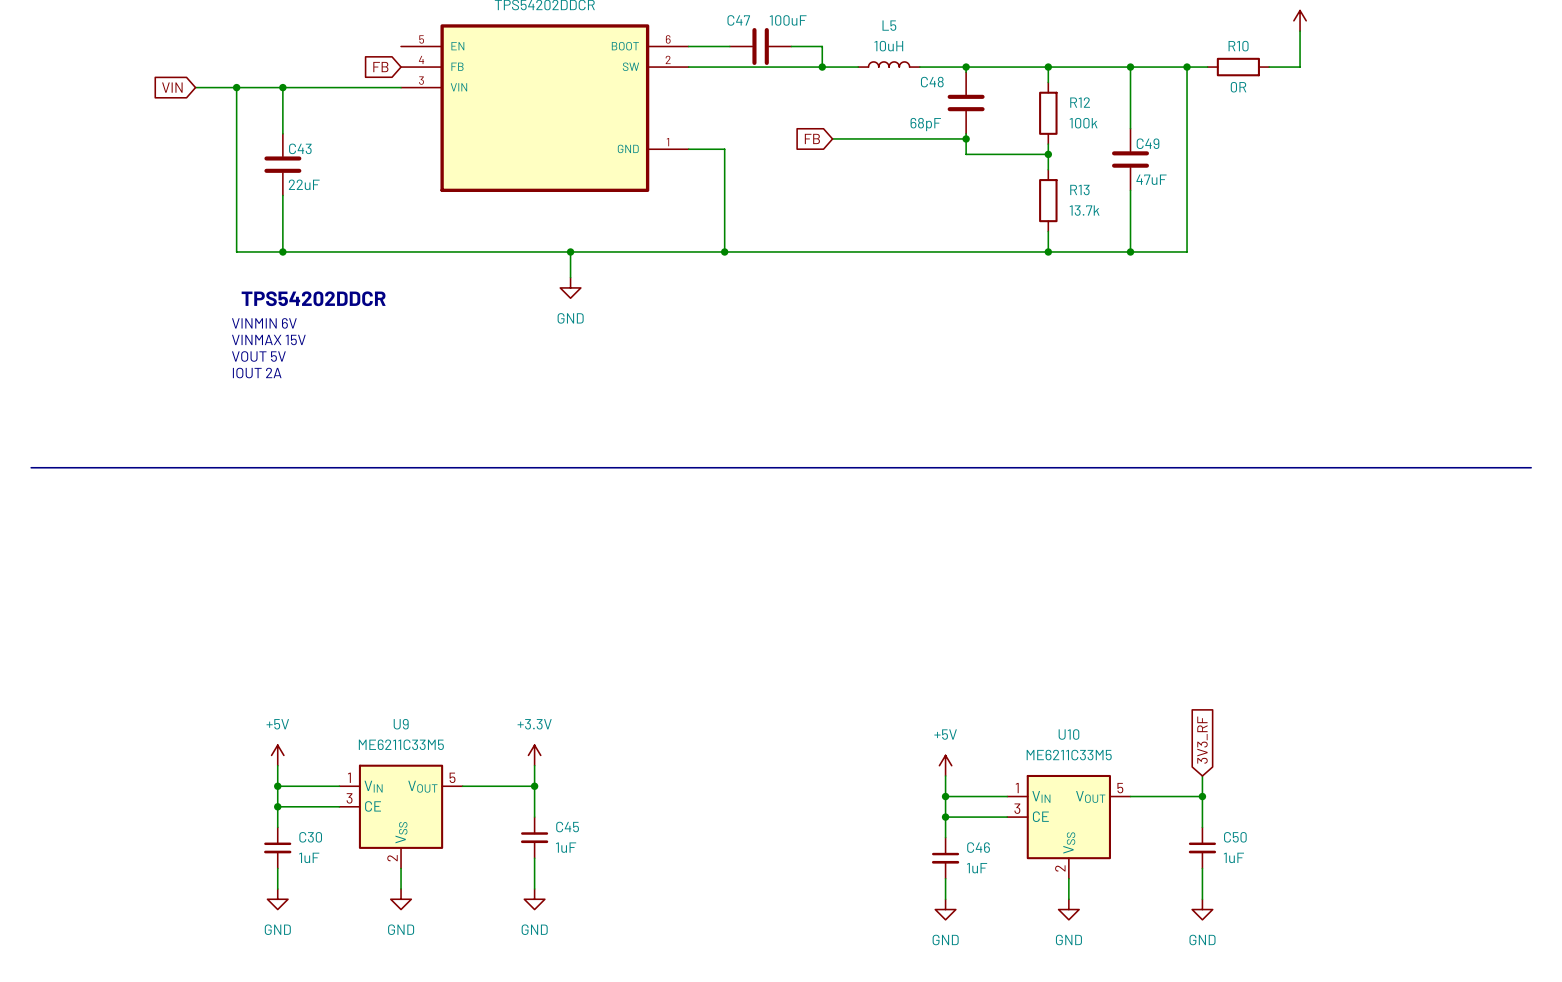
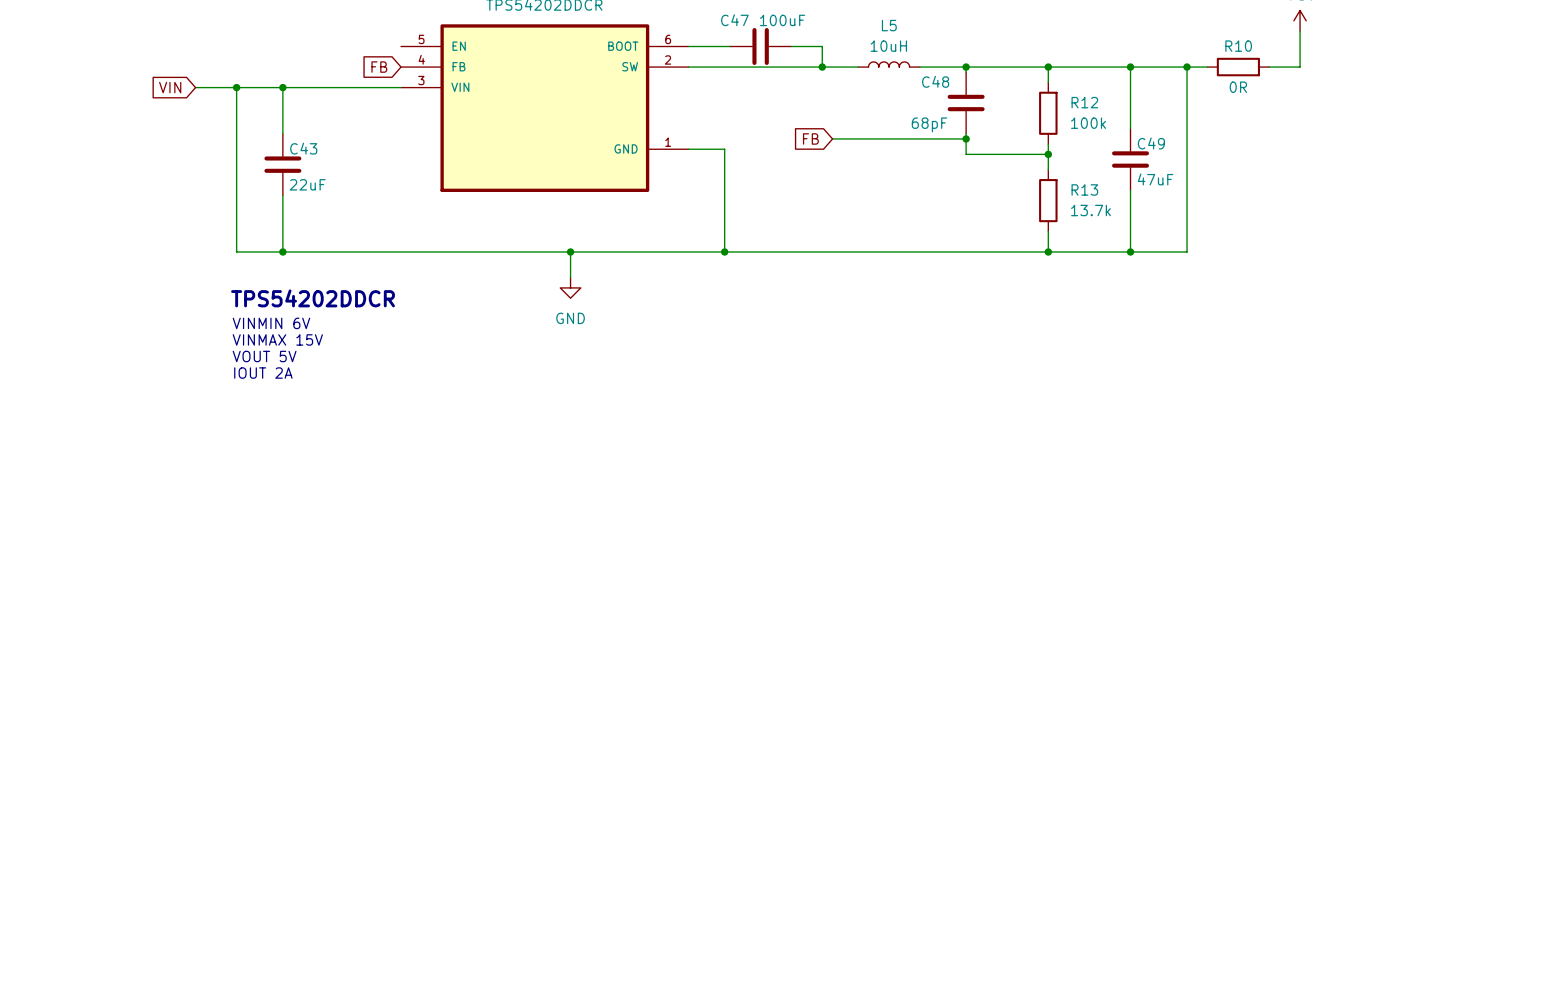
bus: (31, 467) (1531, 467) -> none
global label: 3V3_RF (1202, 740) -> none
power symbol: +5V (277, 755) -> none
power symbol: +3.3V (534, 755) -> none
wire: (277, 765) (277, 827) -> none
wire: (534, 765) (534, 817) -> none
power symbol: +5V (945, 765) -> none
wire: (945, 775) (945, 837) -> none
wire: (1202, 775) (1202, 827) -> none
wire: (277, 786) (339, 786) -> none
junction: (277, 786) -> none
wire: (462, 786) (534, 786) -> none
junction: (534, 786) -> none
wire: (945, 796) (1007, 796) -> none
junction: (945, 796) -> none
wire: (1130, 796) (1202, 796) -> none
junction: (1202, 796) -> none
wire: (277, 806) (339, 806) -> none
junction: (277, 806) -> none
U9: ME6211C33M5 (401, 816) -> none
wire: (945, 817) (1007, 817) -> none
junction: (945, 817) -> none
U10: ME6211C33M5 (1068, 826) -> none
C45: 1uF (534, 837) -> none
C30: 1uF (277, 847) -> none
C50: 1uF (1202, 847) -> none
wire: (534, 858) (534, 889) -> none
C46: 1uF (945, 858) -> none
wire: (277, 868) (277, 889) -> none
wire: (401, 868) (401, 889) -> none
wire: (1202, 868) (1202, 899) -> none
wire: (945, 878) (945, 899) -> none
wire: (1068, 878) (1068, 899) -> none
power symbol: GND (277, 899) -> none
power symbol: GND (401, 899) -> none
power symbol: GND (534, 899) -> none
power symbol: GND (945, 909) -> none
power symbol: GND (1068, 909) -> none
power symbol: GND (1202, 909) -> none

